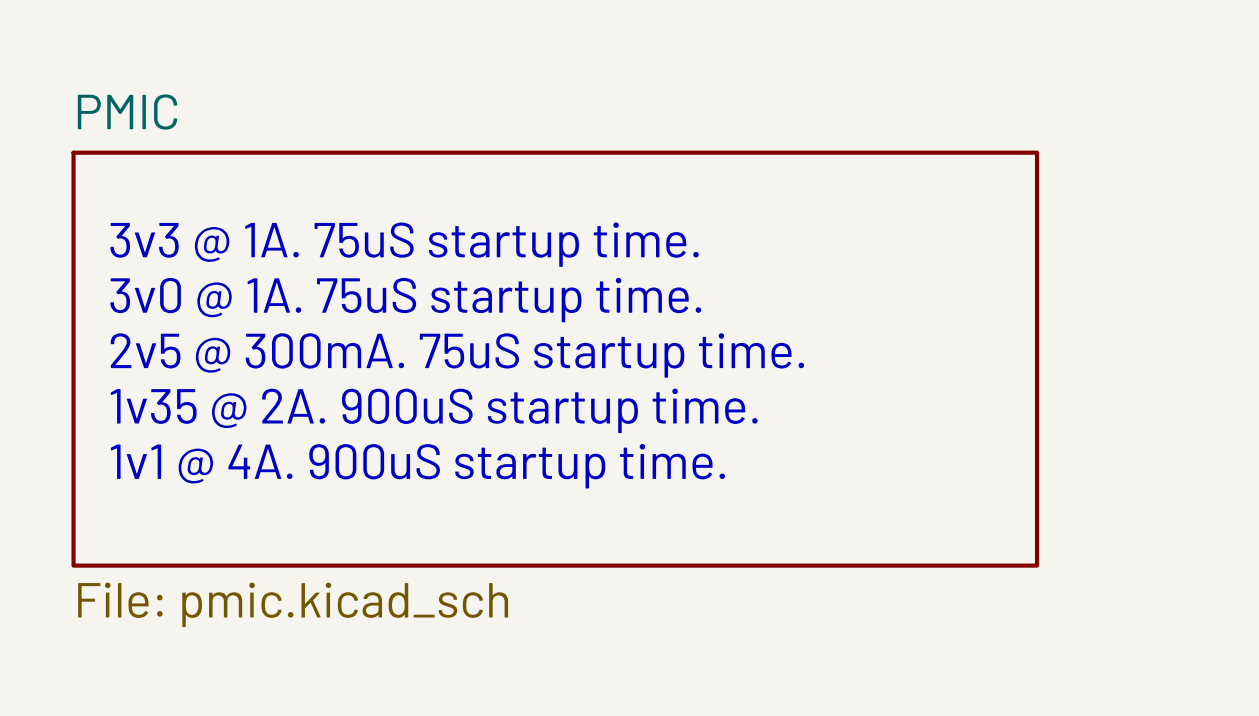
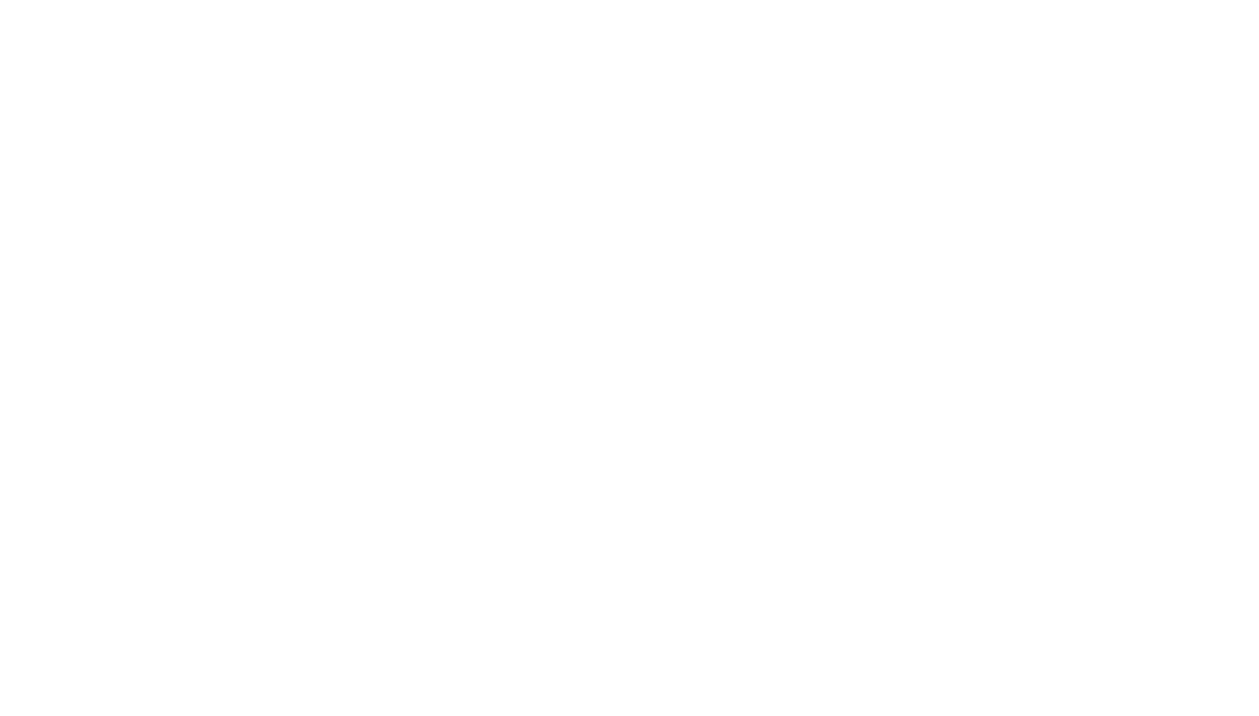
text: 3v3 @ 1A. 75uS startup time. (404, 244) -> none
text: 3v0 @ 1A. 75uS startup time. (405, 300) -> none
text: 2v5 @ 300mA. 75uS startup time. (457, 355) -> none
sheet PMIC: File: pmic.kicad_sch (555, 359) -> none
text: 1v35 @ 2A. 900uS startup time. (434, 410) -> none
text: 1v1 @ 4A. 900uS startup time. (417, 466) -> none

